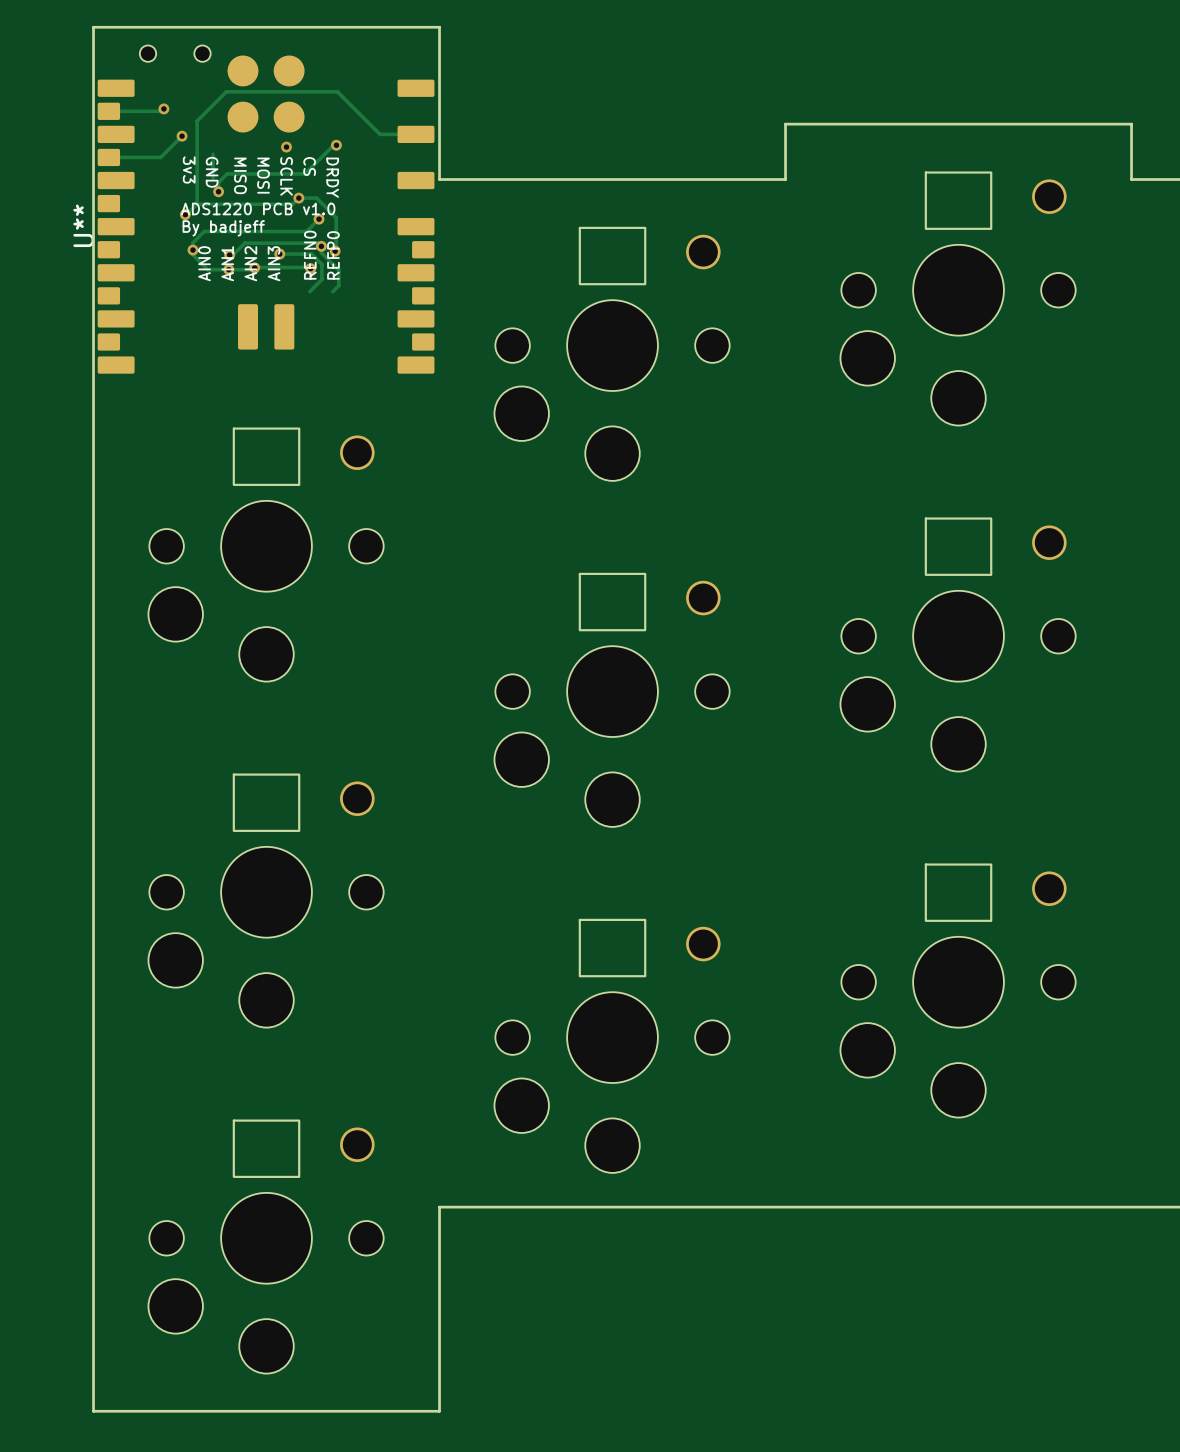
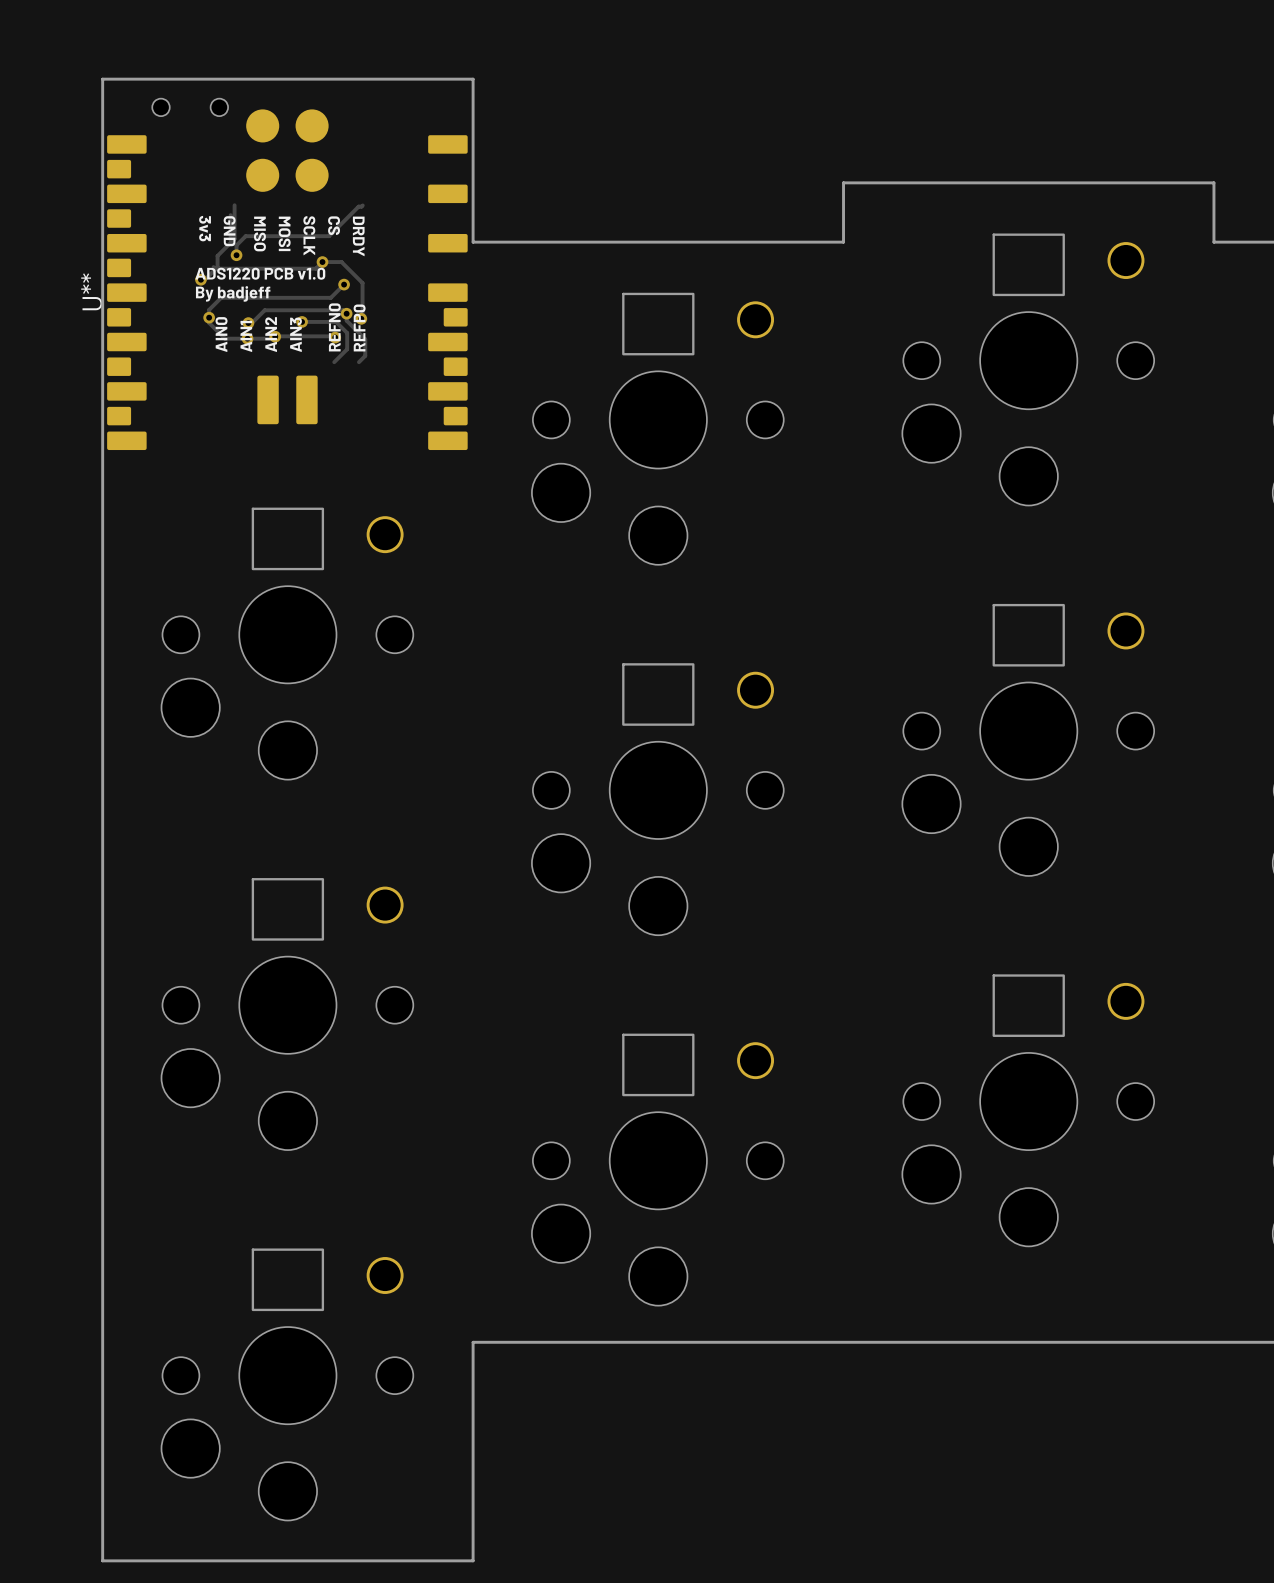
track: (163, 108) (161, 111) (108, 111) -> none
via: (163, 108) -> none
track: (416, 134) (380, 134) (337, 91) (226, 91) (197, 121) (197, 204) (185, 214) -> none
track: (182, 136) (160, 157) (108, 157) -> none
via: (182, 136) -> none
track: none -> (234, 205) (234, 238) (217, 255) (217, 267) (204, 278)
via: (336, 145) -> none
via: (286, 147) -> none

